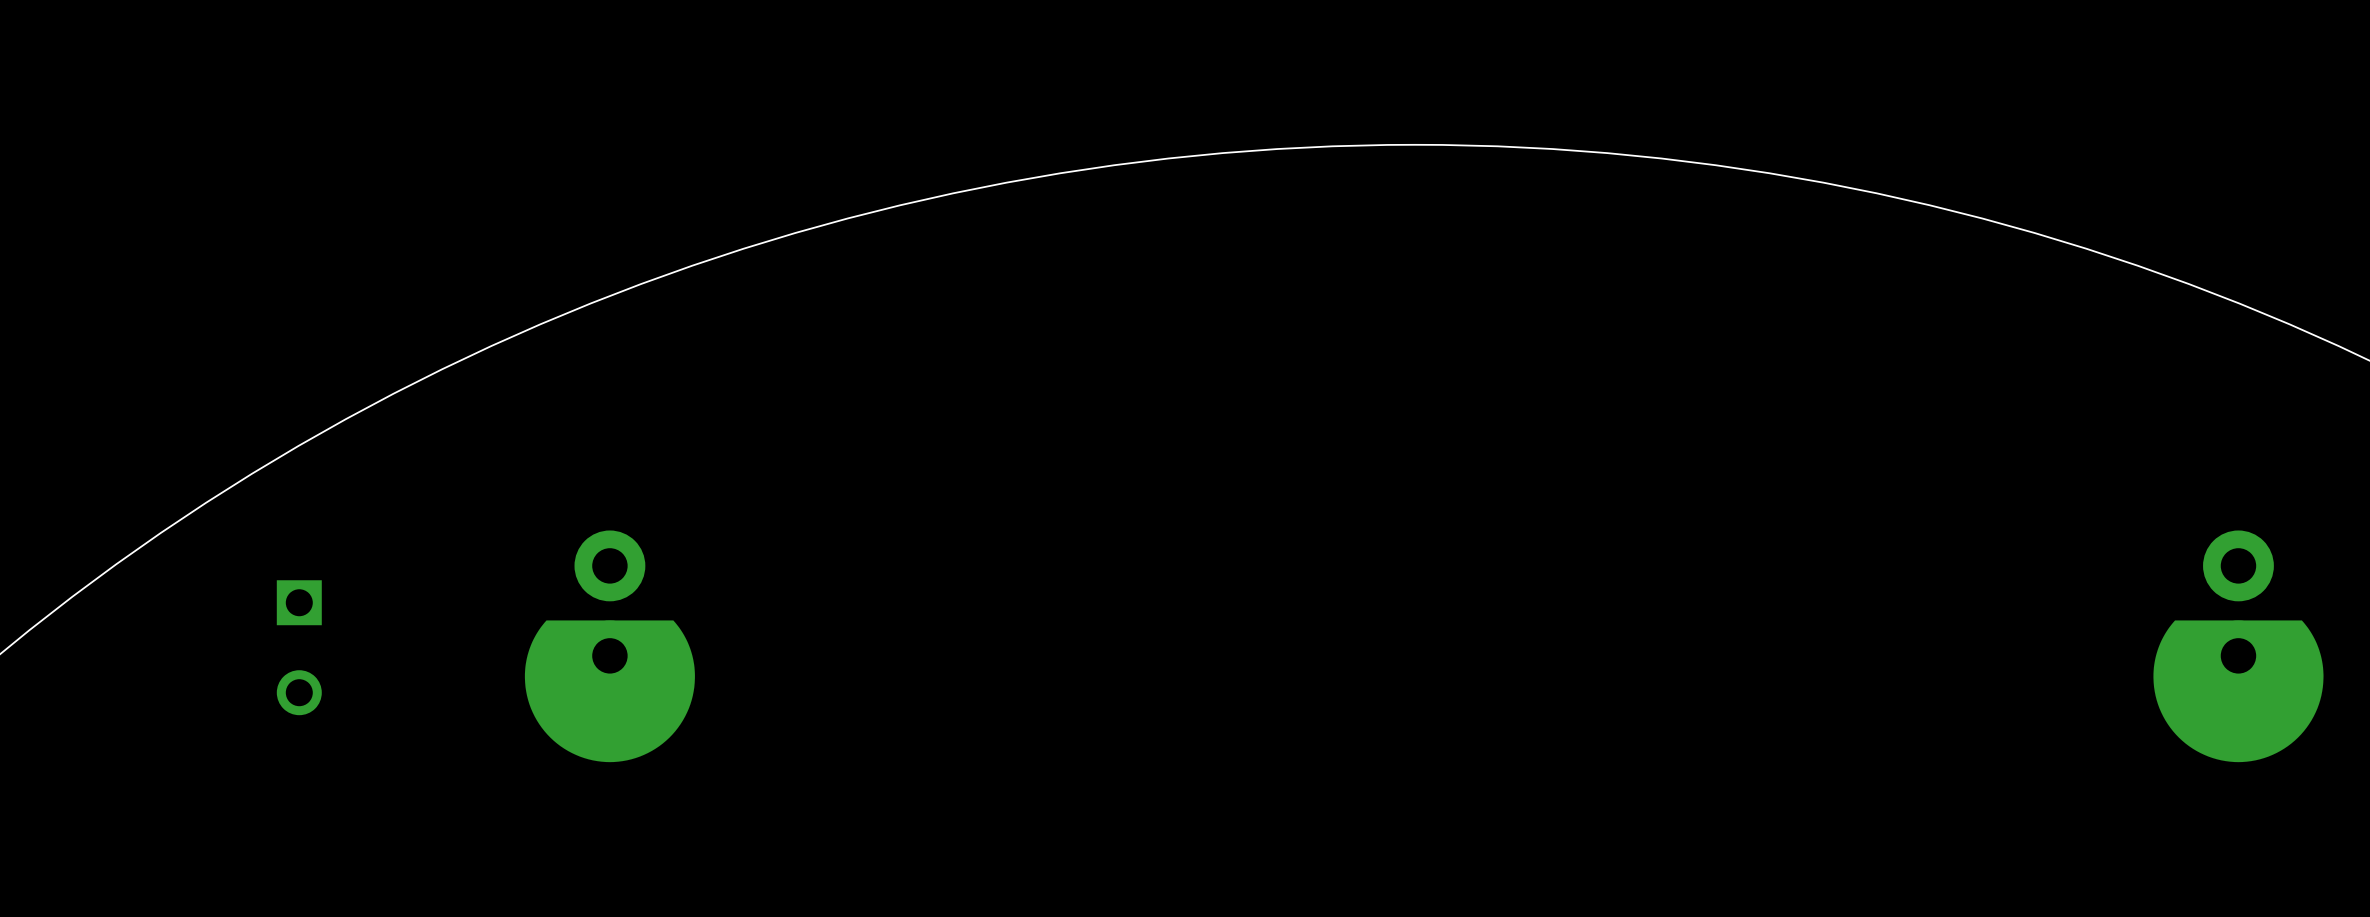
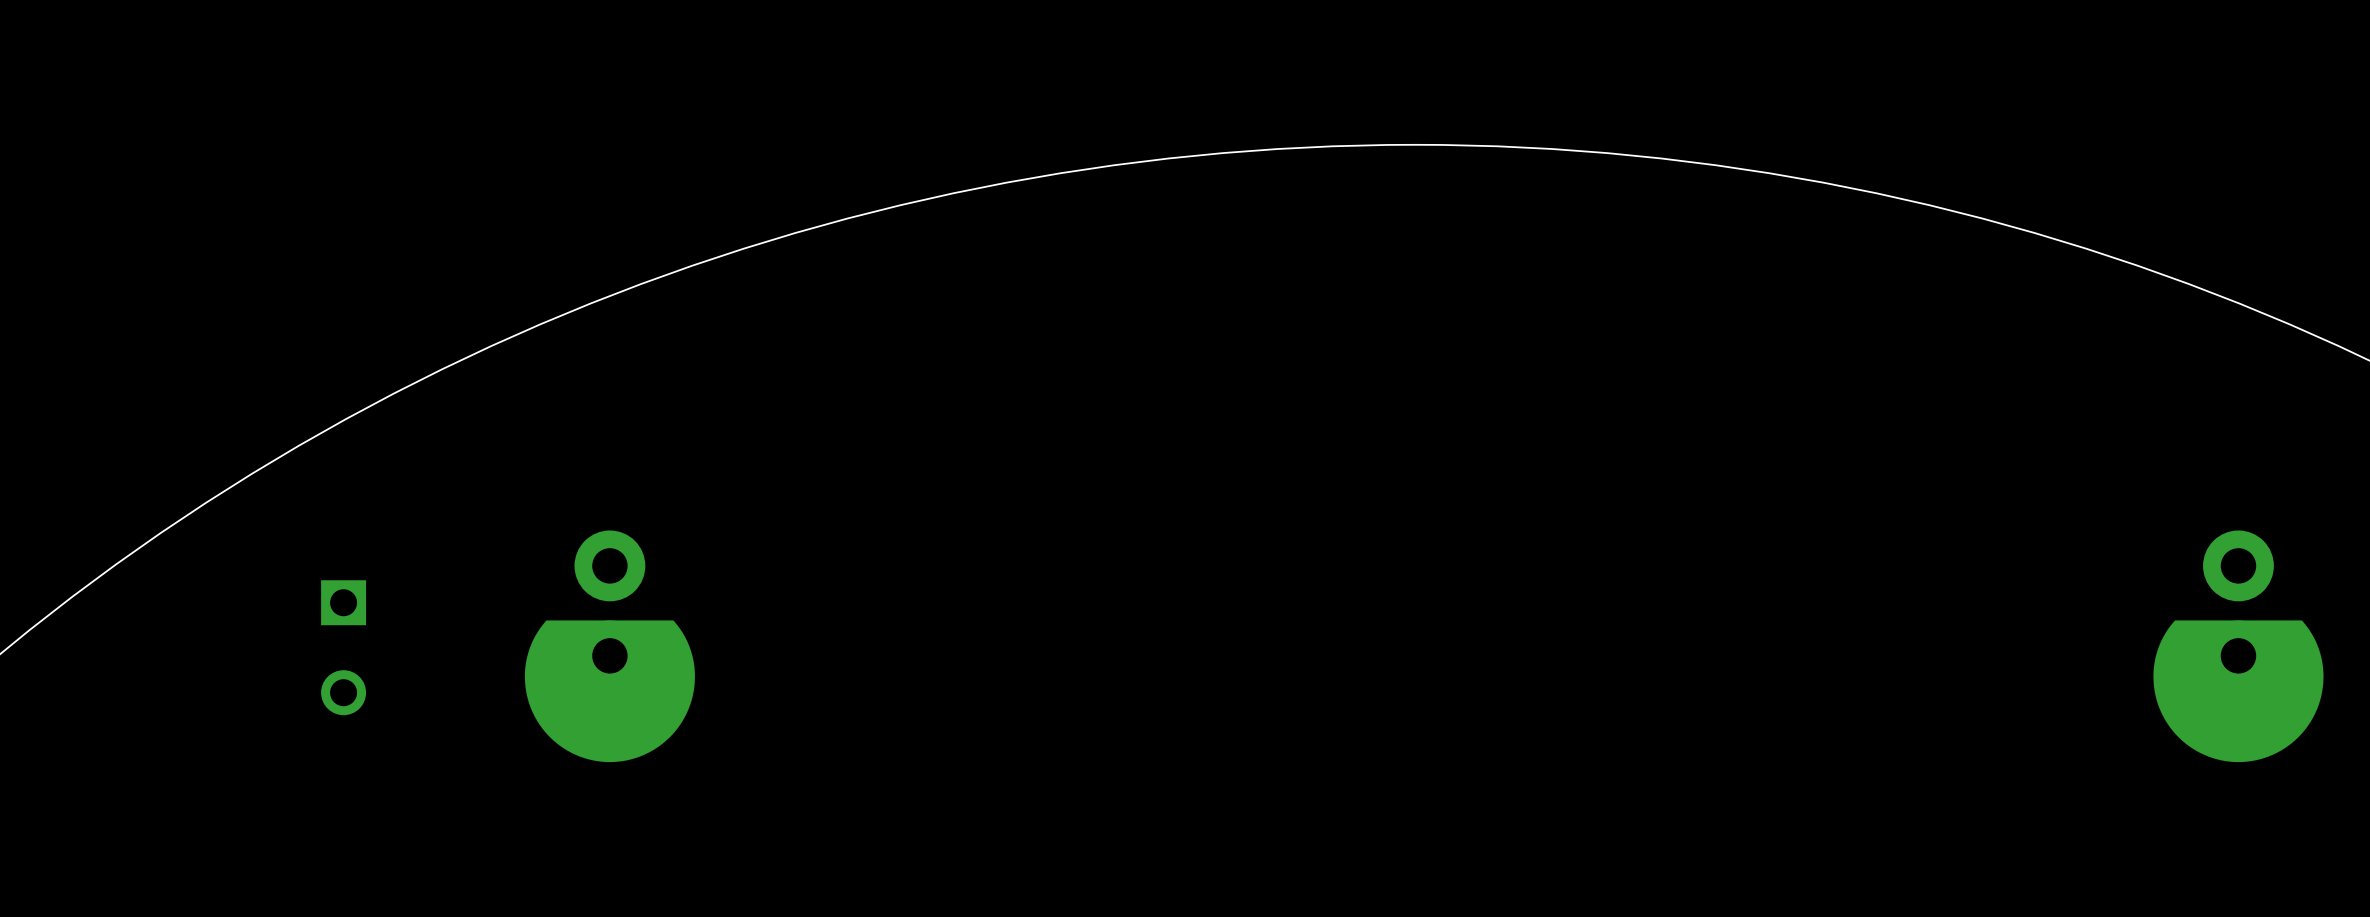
part position: (299, 647) -> (343, 647)

